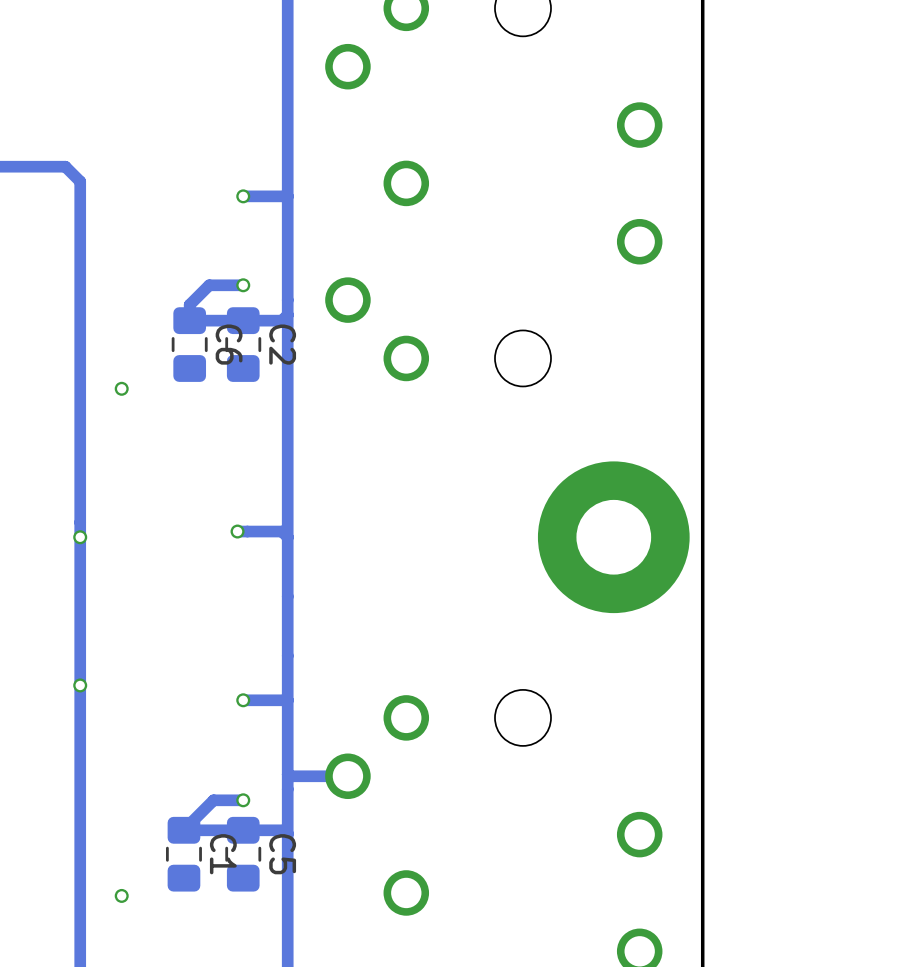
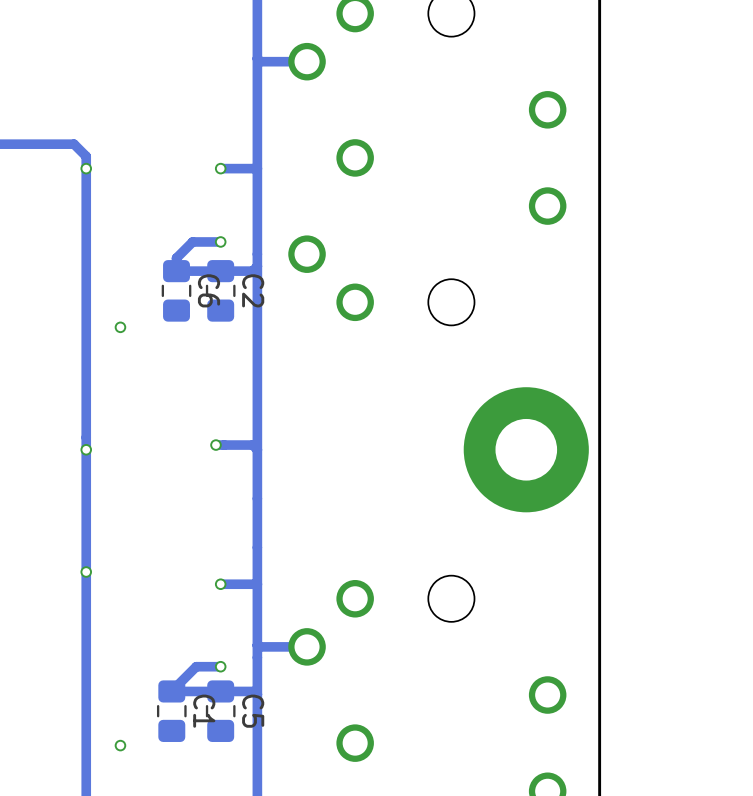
track: none -> (257, 58) (260, 61) (307, 61)
via: none -> (86, 168)

